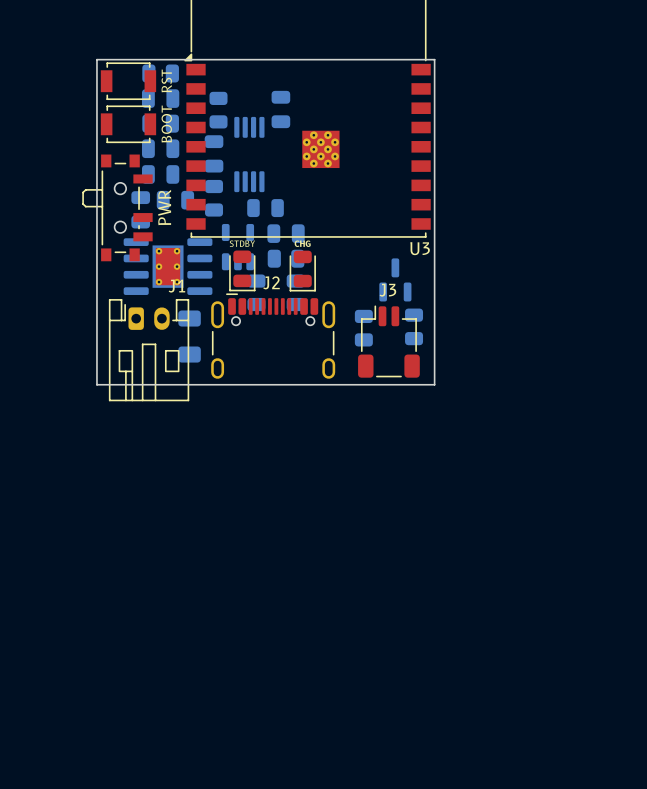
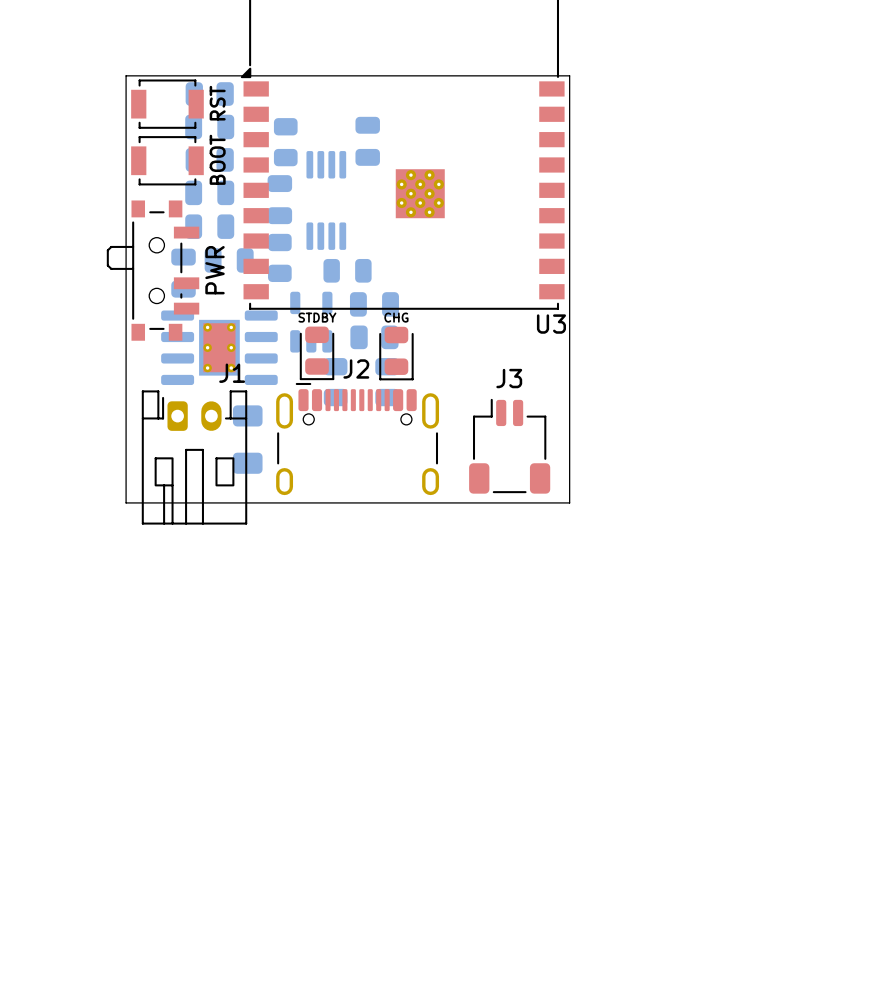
part: (395, 279) -> none
part: (414, 326) -> none
part: (363, 328) -> none

